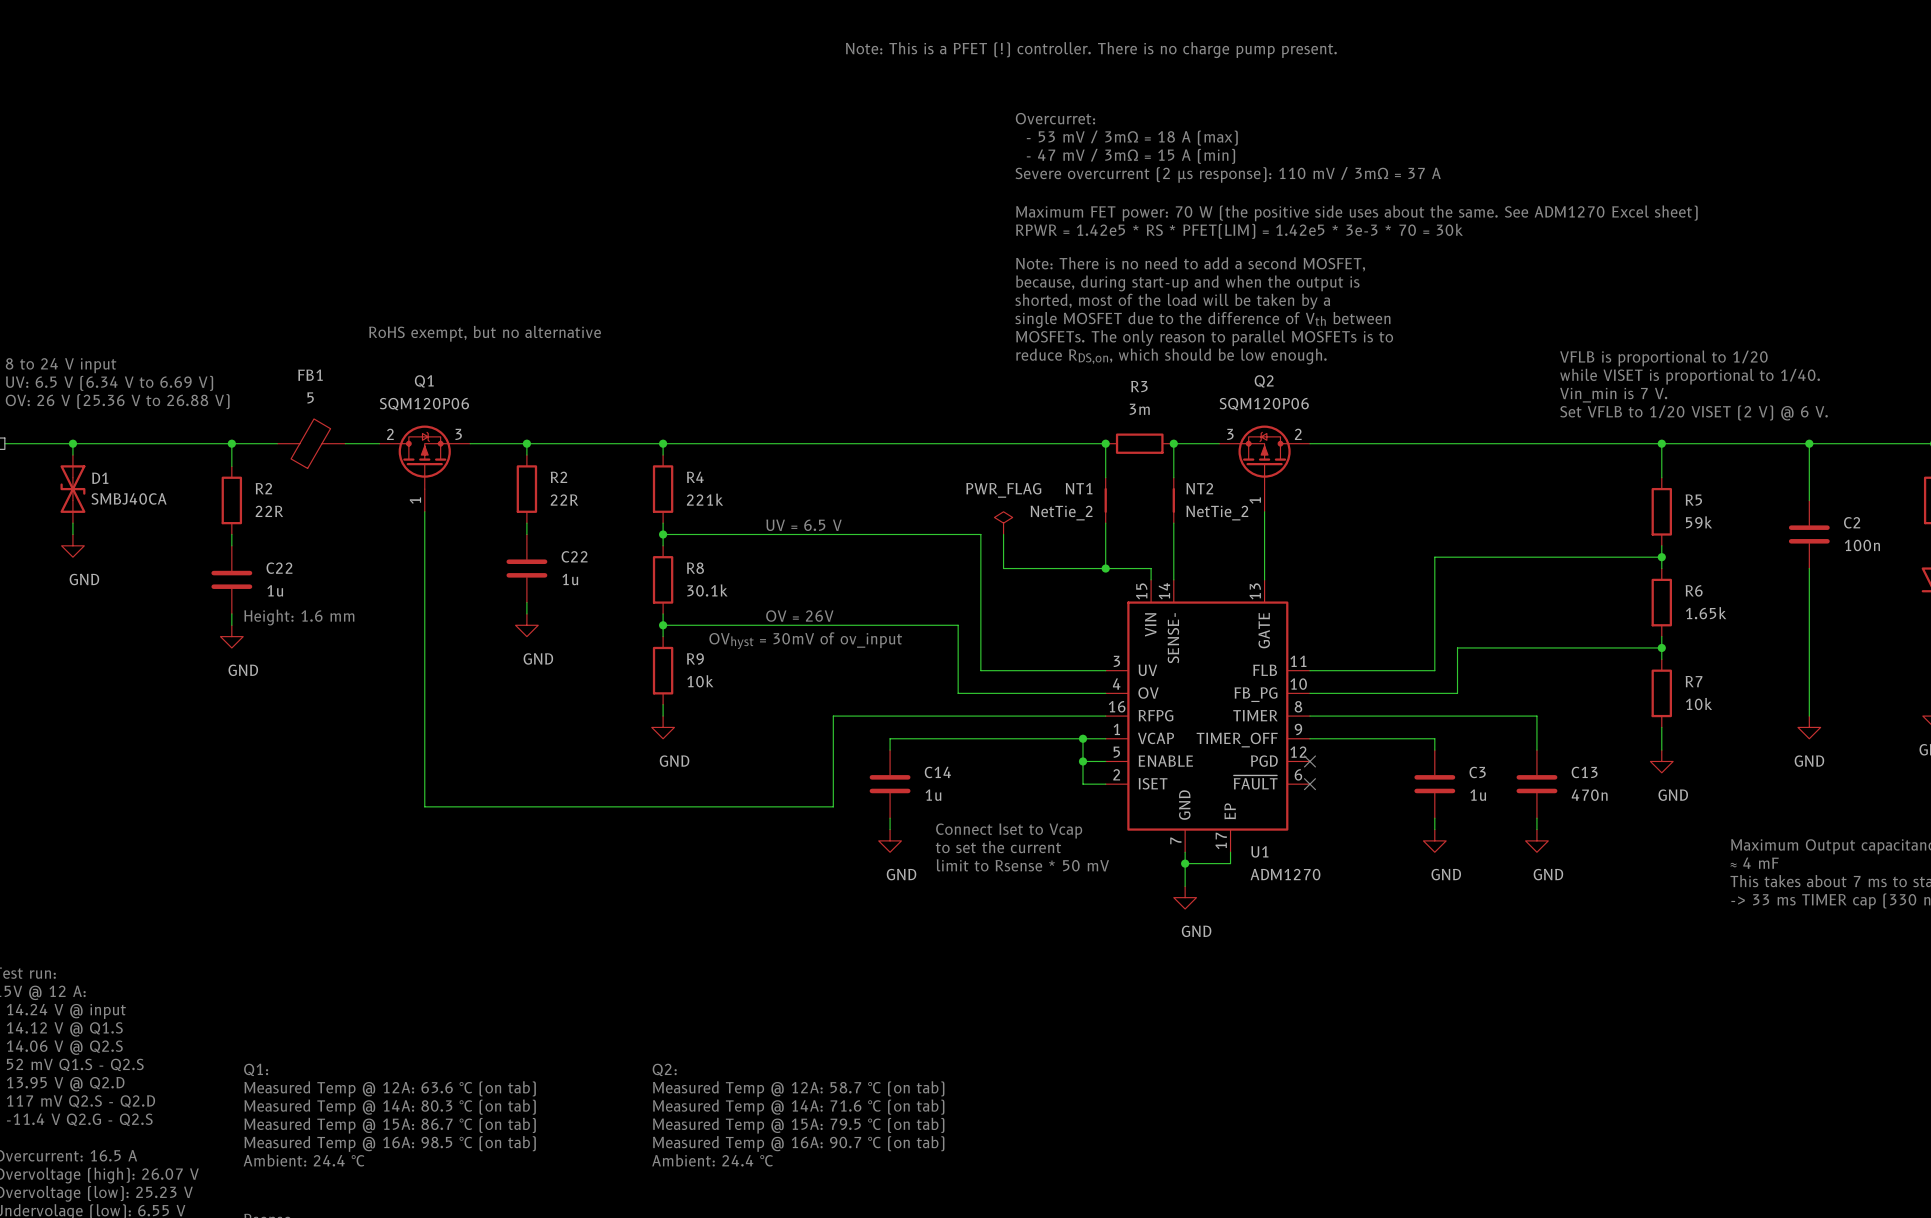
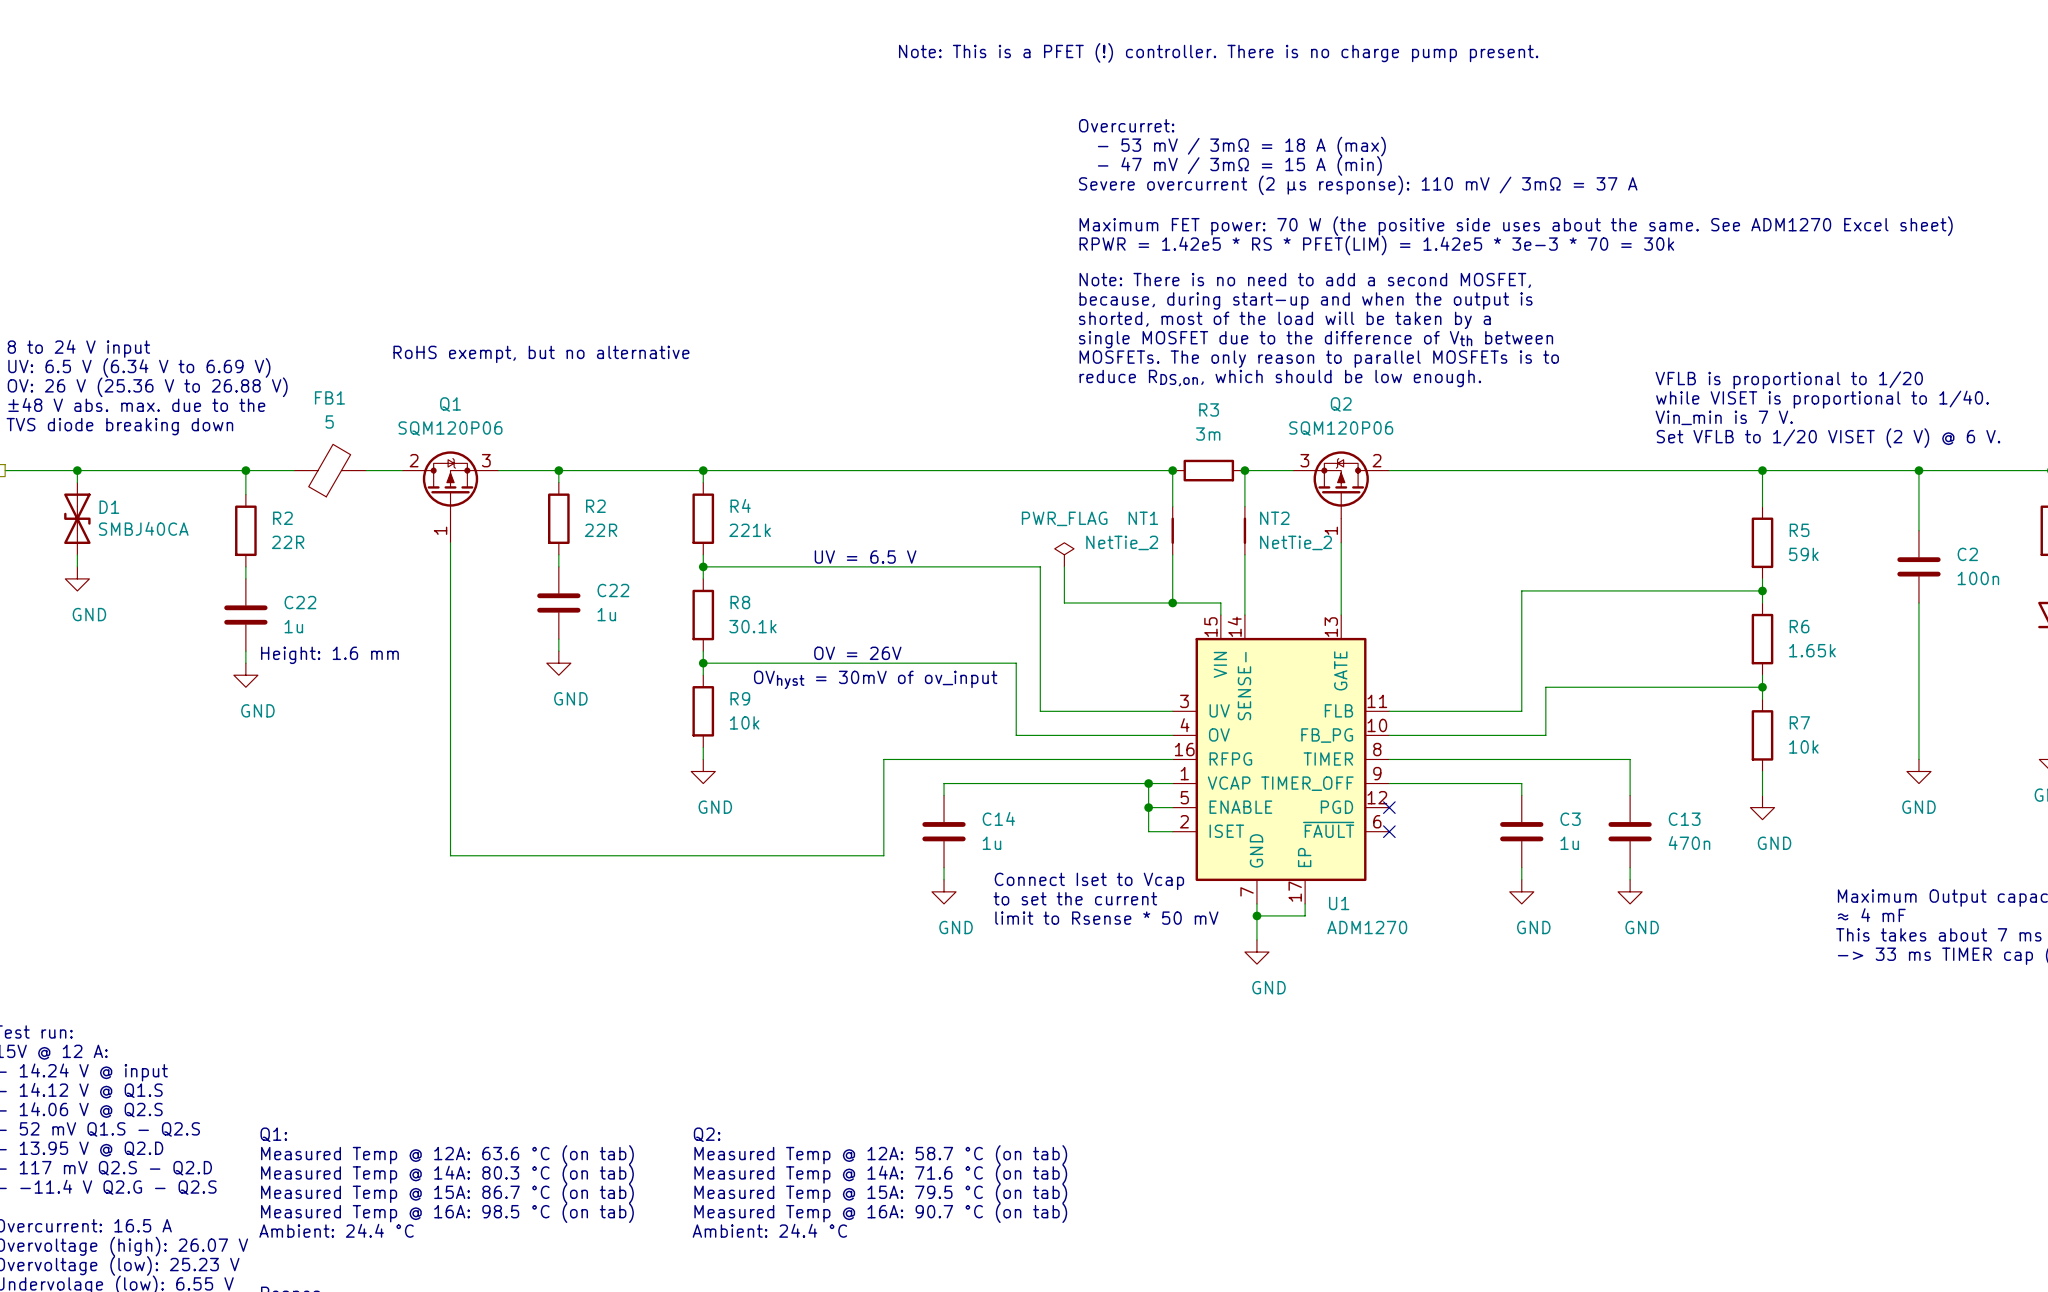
text: none -> 8 to 24 V input (78, 348)
text: none -> UV: 6.5 V (6.34 V to 6.69 V) (139, 367)
text: 8 to 24 V input (61, 365) -> OV: 26 V (25.36 V to 26.88 V) (147, 387)
text: UV: 6.5 V (6.34 V to 6.69 V) (109, 383) -> ±48 V abs. max. due to the (136, 404)
text: OV: 26 V (25.36 V to 26.88 V) (117, 401) -> TVS diode breaking down (119, 426)

